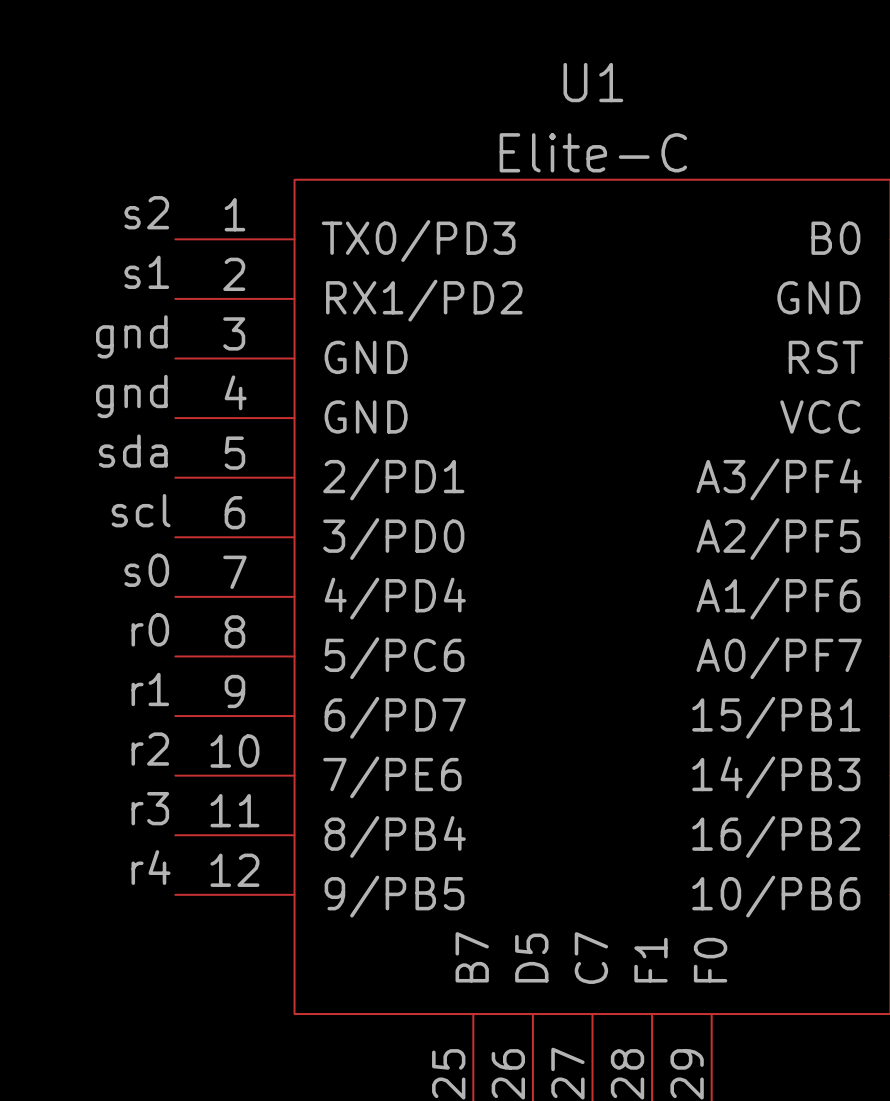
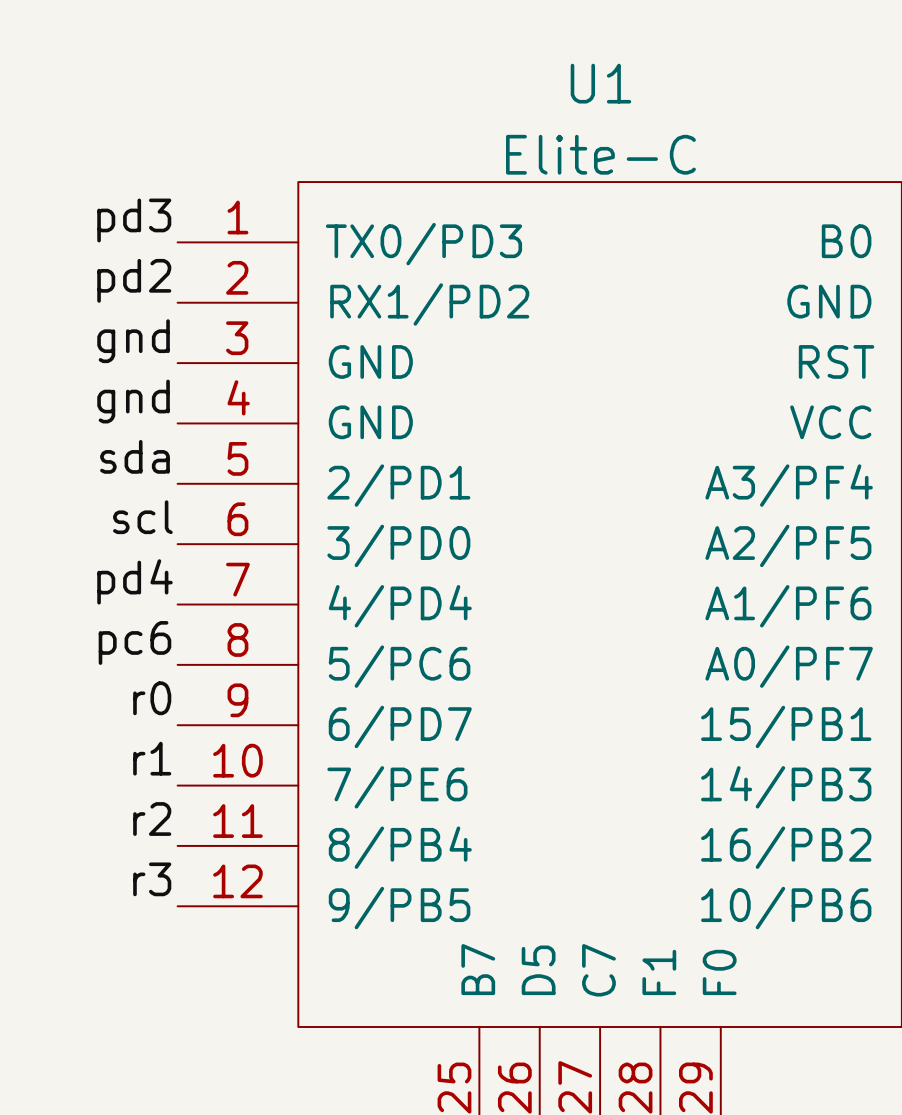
label: s2 (146, 212) -> pd3 (134, 220)
label: s1 (146, 272) -> pd2 (134, 280)
label: s0 (146, 570) -> pd4 (134, 581)
label: r0 (150, 629) -> pc6 (134, 642)
label: r1 (150, 689) -> r0 (152, 698)
label: r2 (150, 749) -> r1 (152, 758)
label: r3 (150, 808) -> r2 (152, 819)
label: r4 (151, 867) -> r3 (152, 879)

